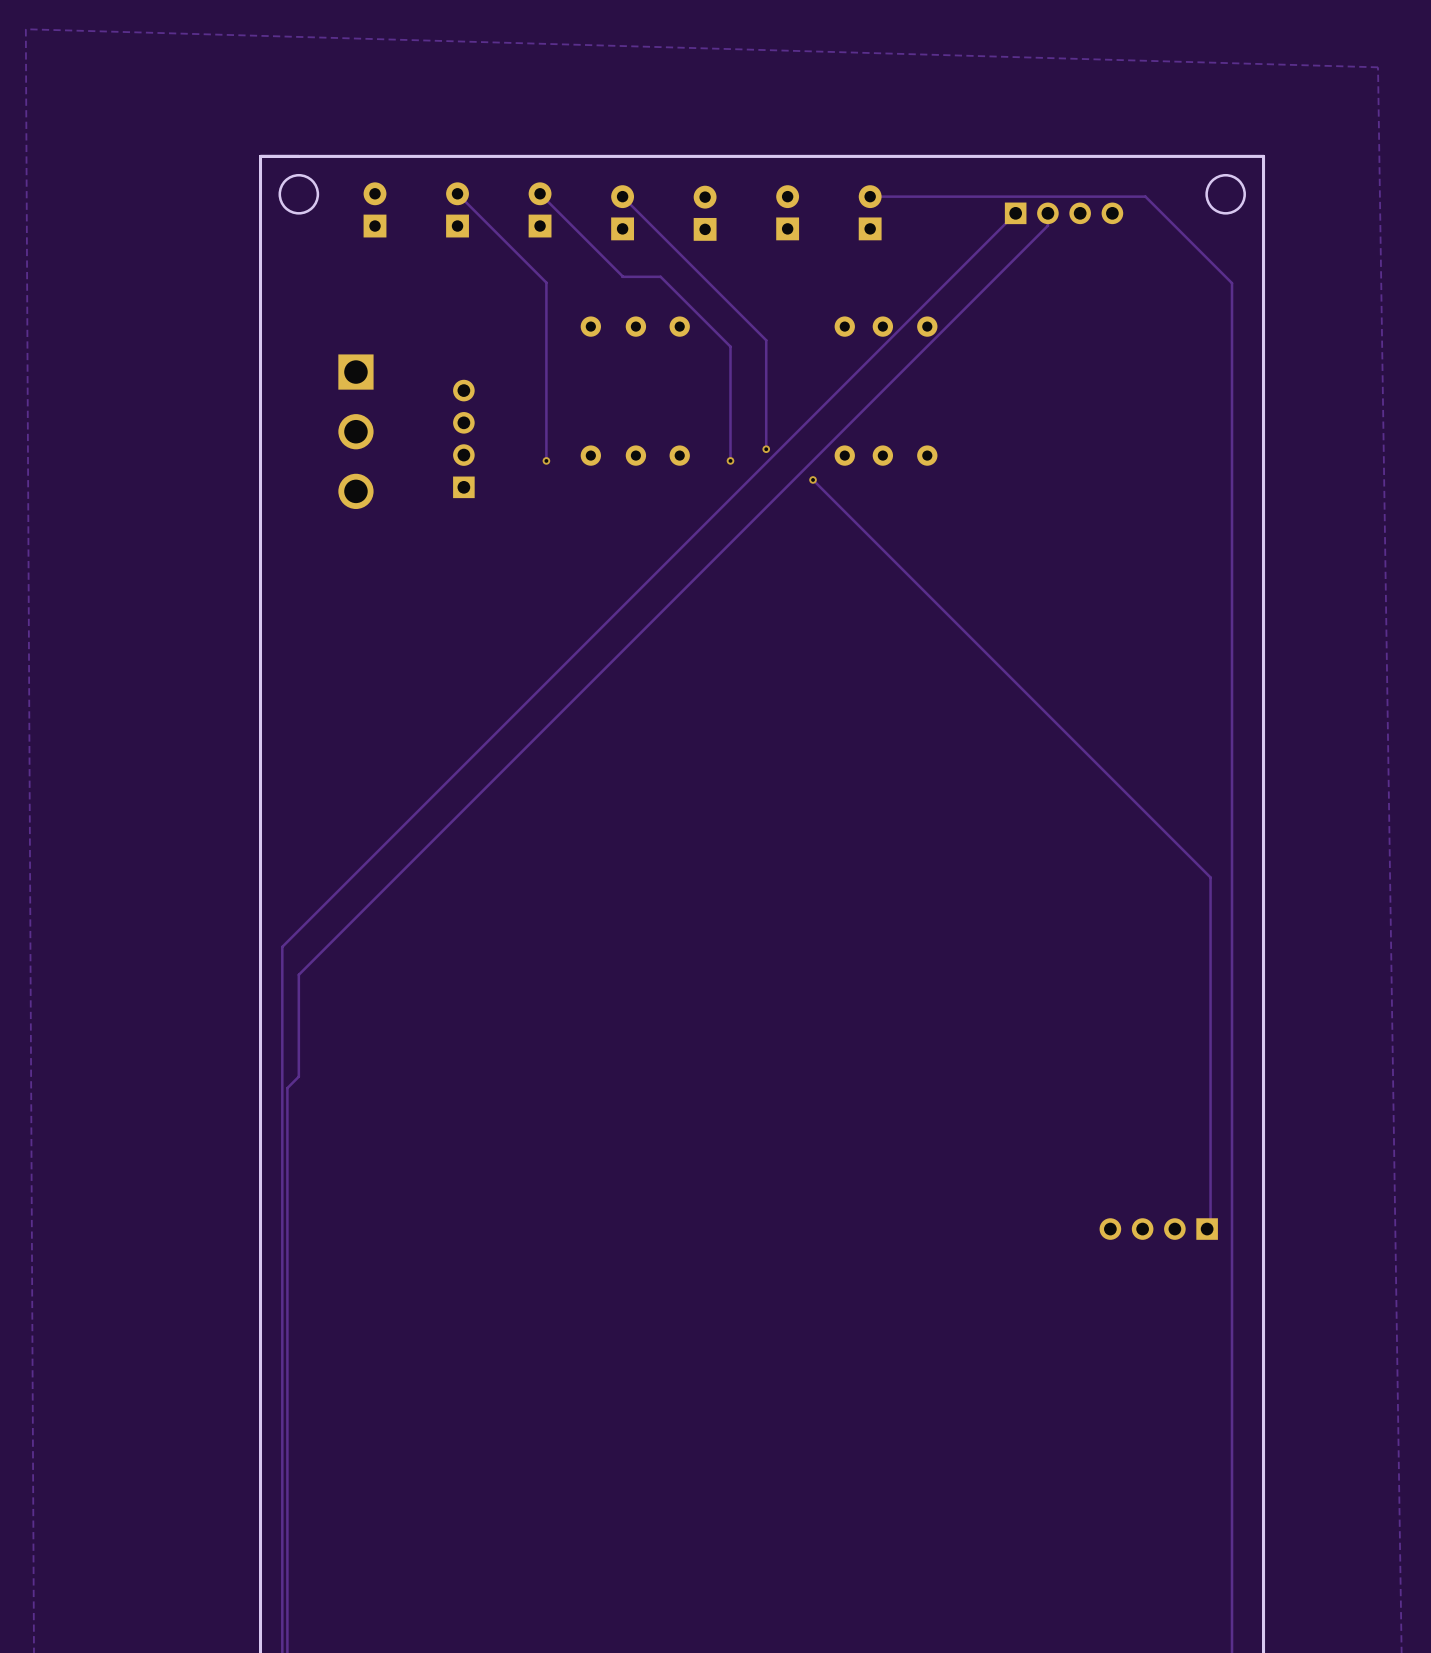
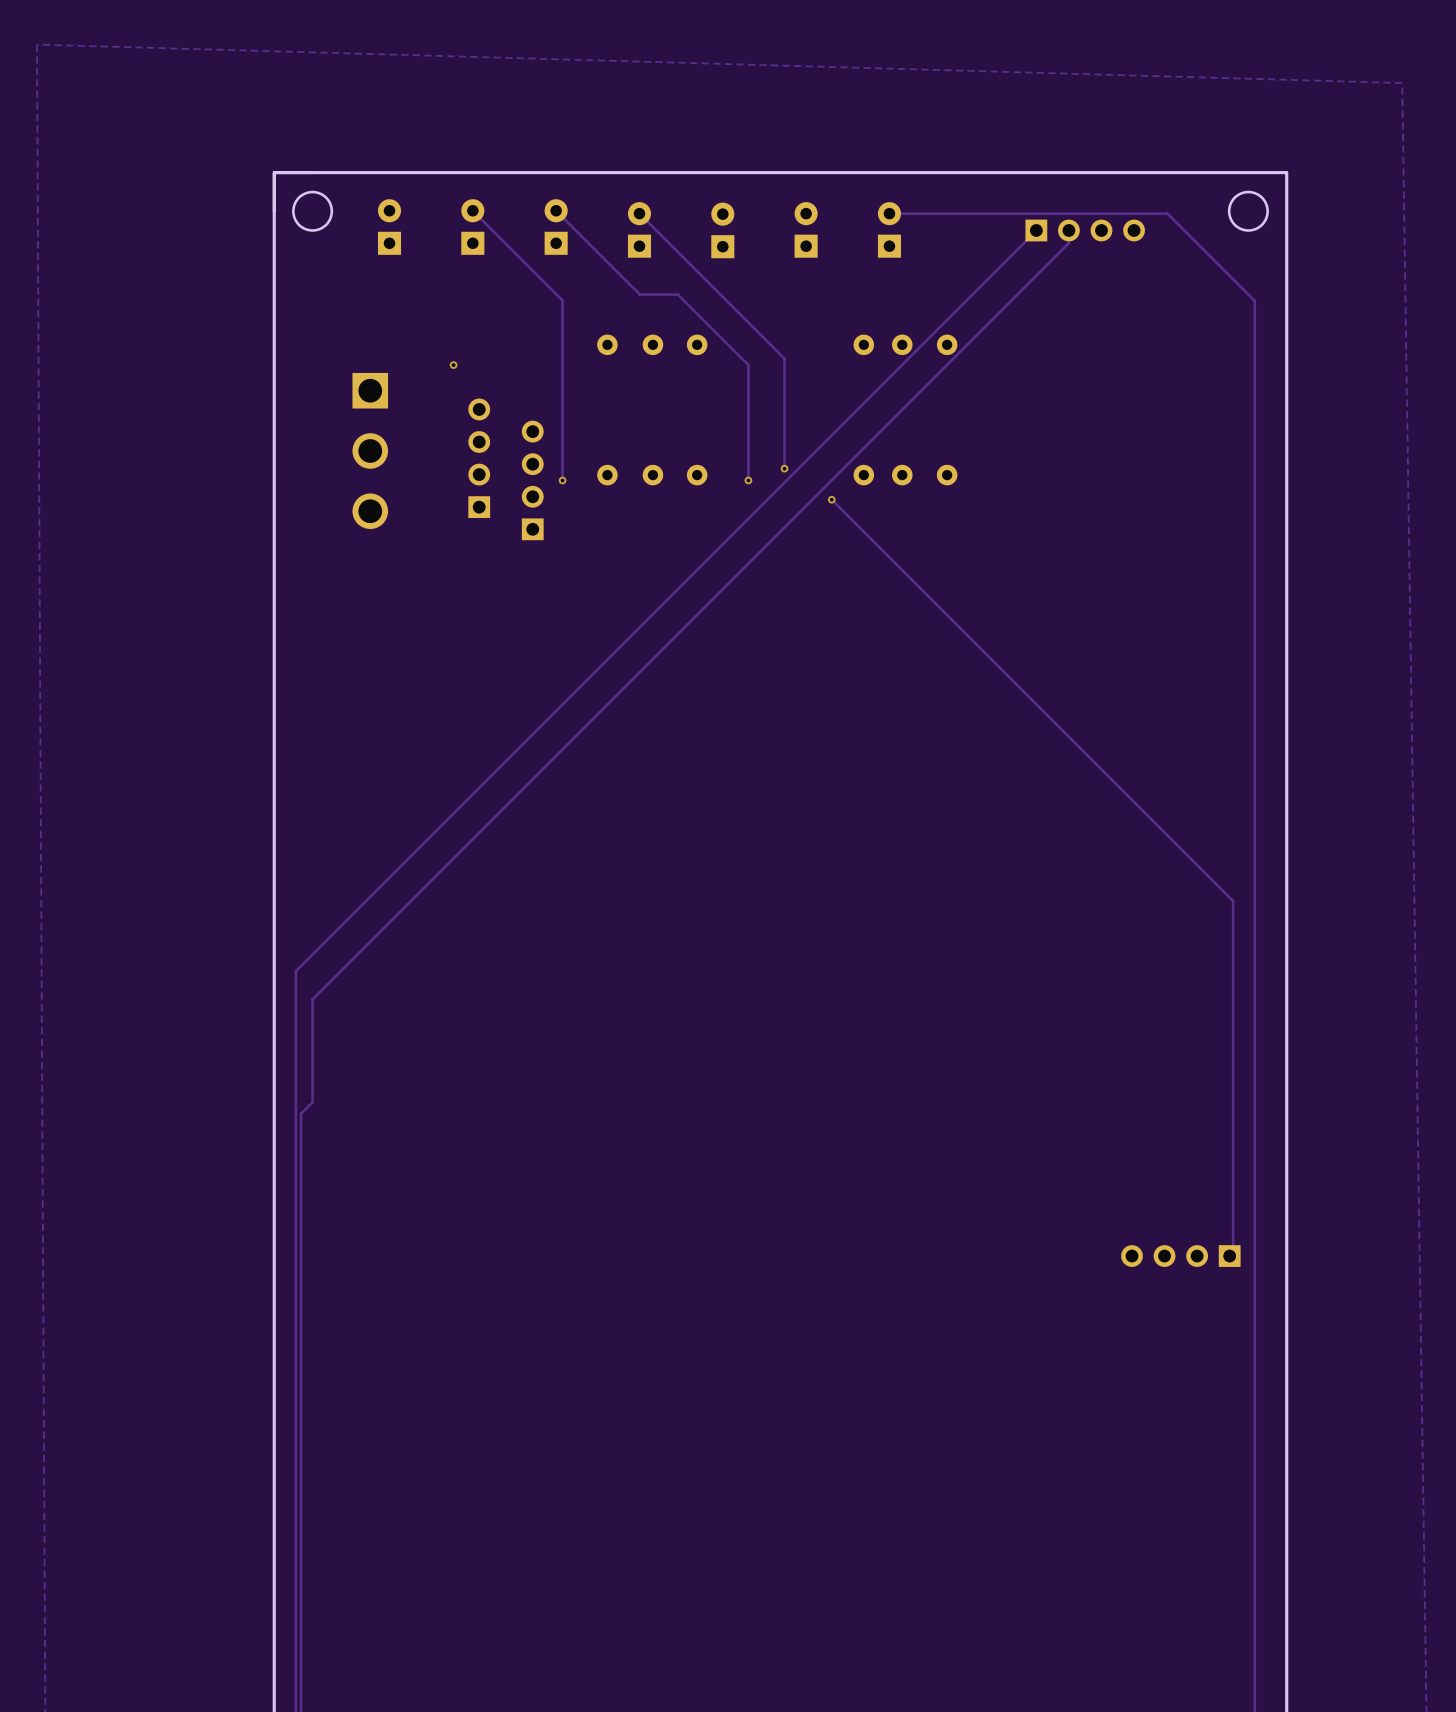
via: none -> (453, 365)
part: none -> (532, 480)

